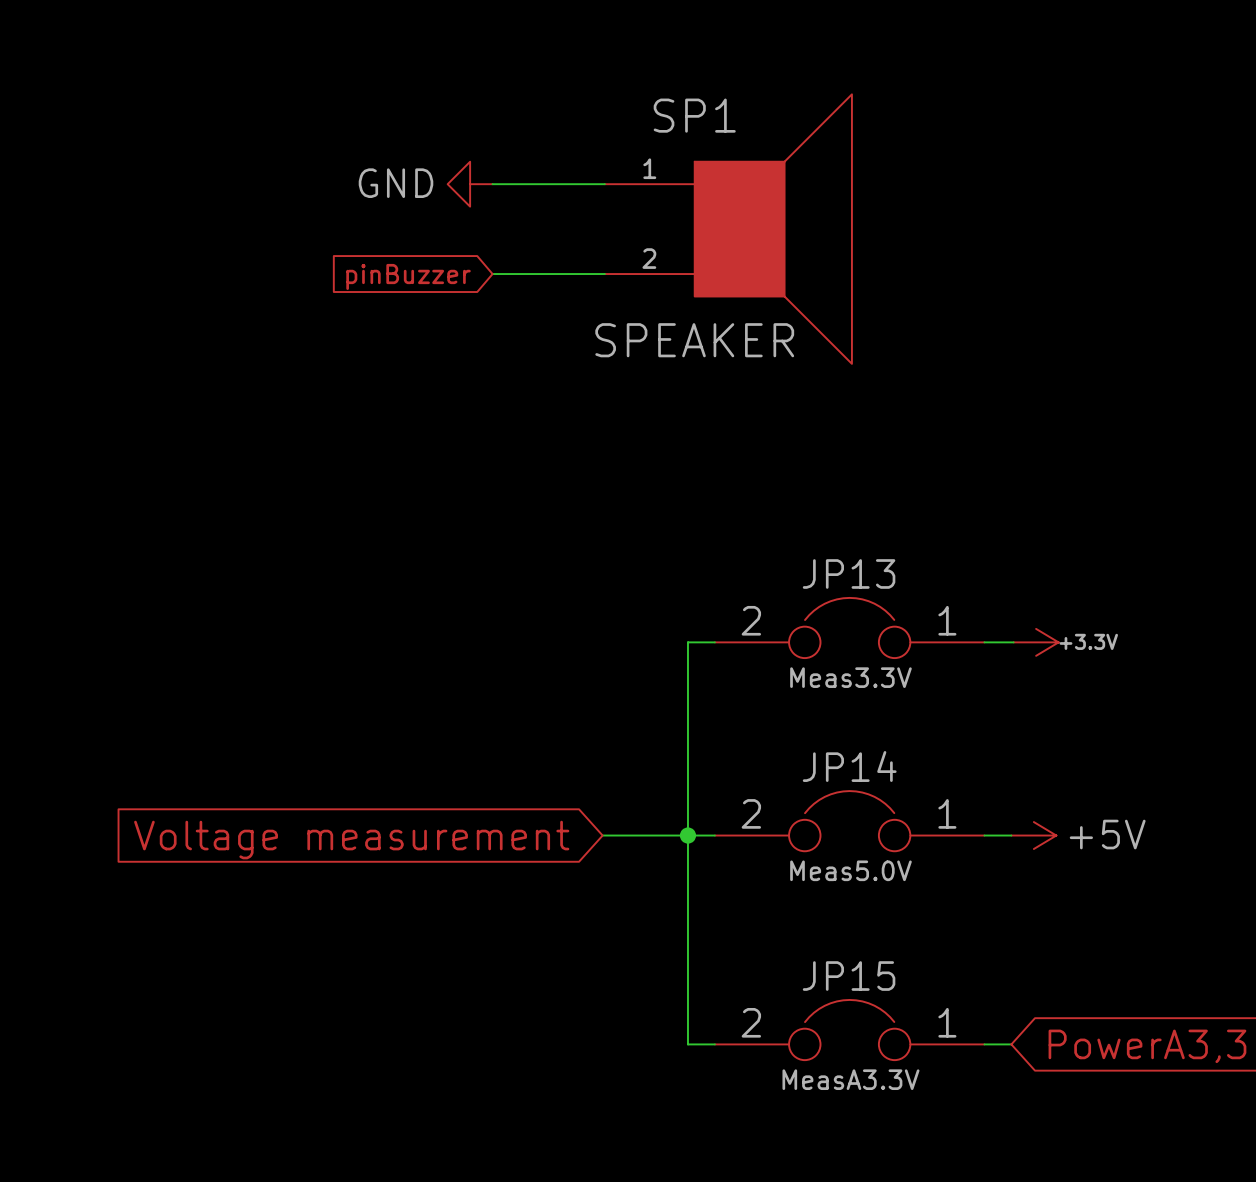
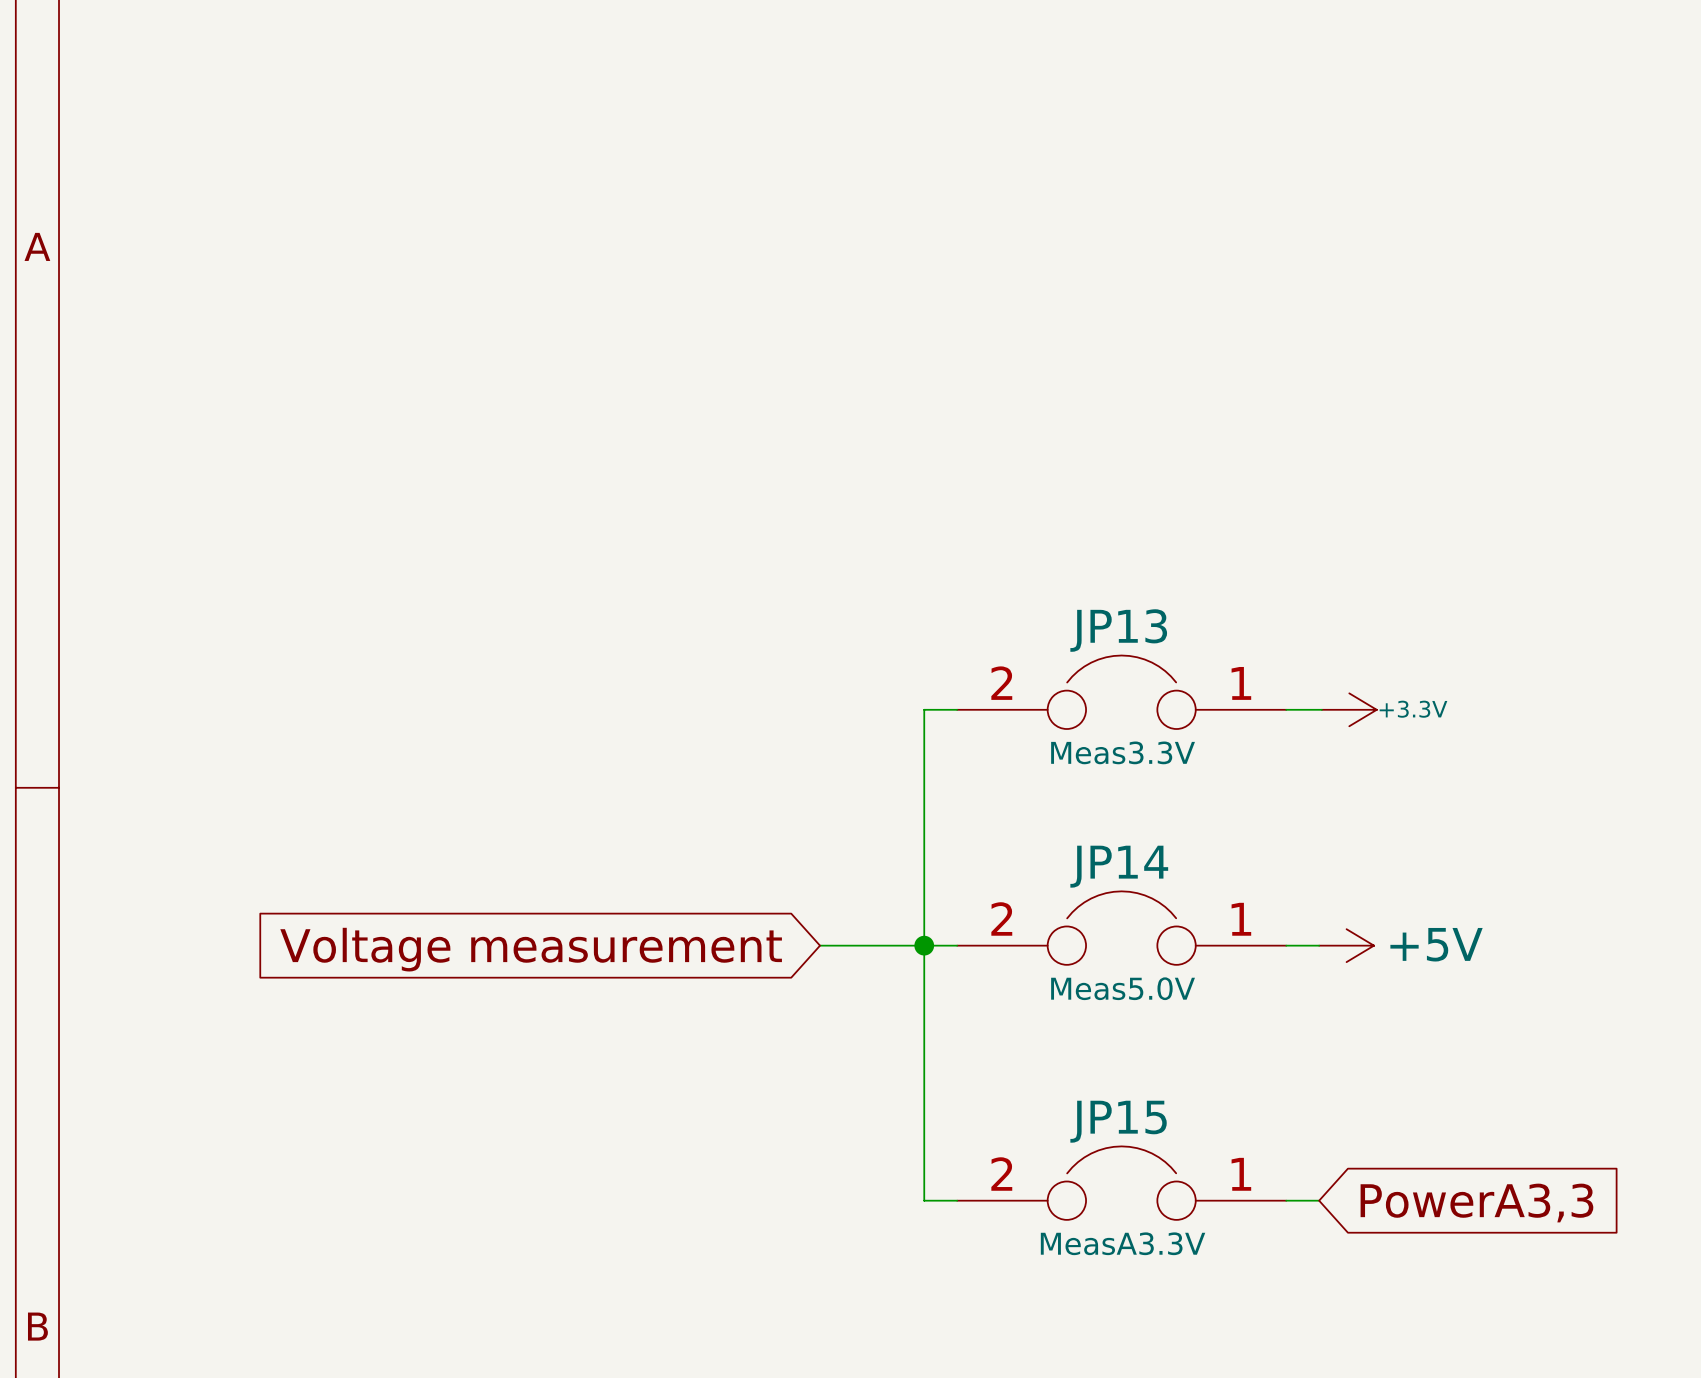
power symbol: GND (470, 184) -> none
wire: (492, 184) (604, 184) -> none
SP1: SPEAKER (728, 229) -> none
wire: (492, 274) (604, 274) -> none
global label: pinBuzzer (408, 276) -> none

